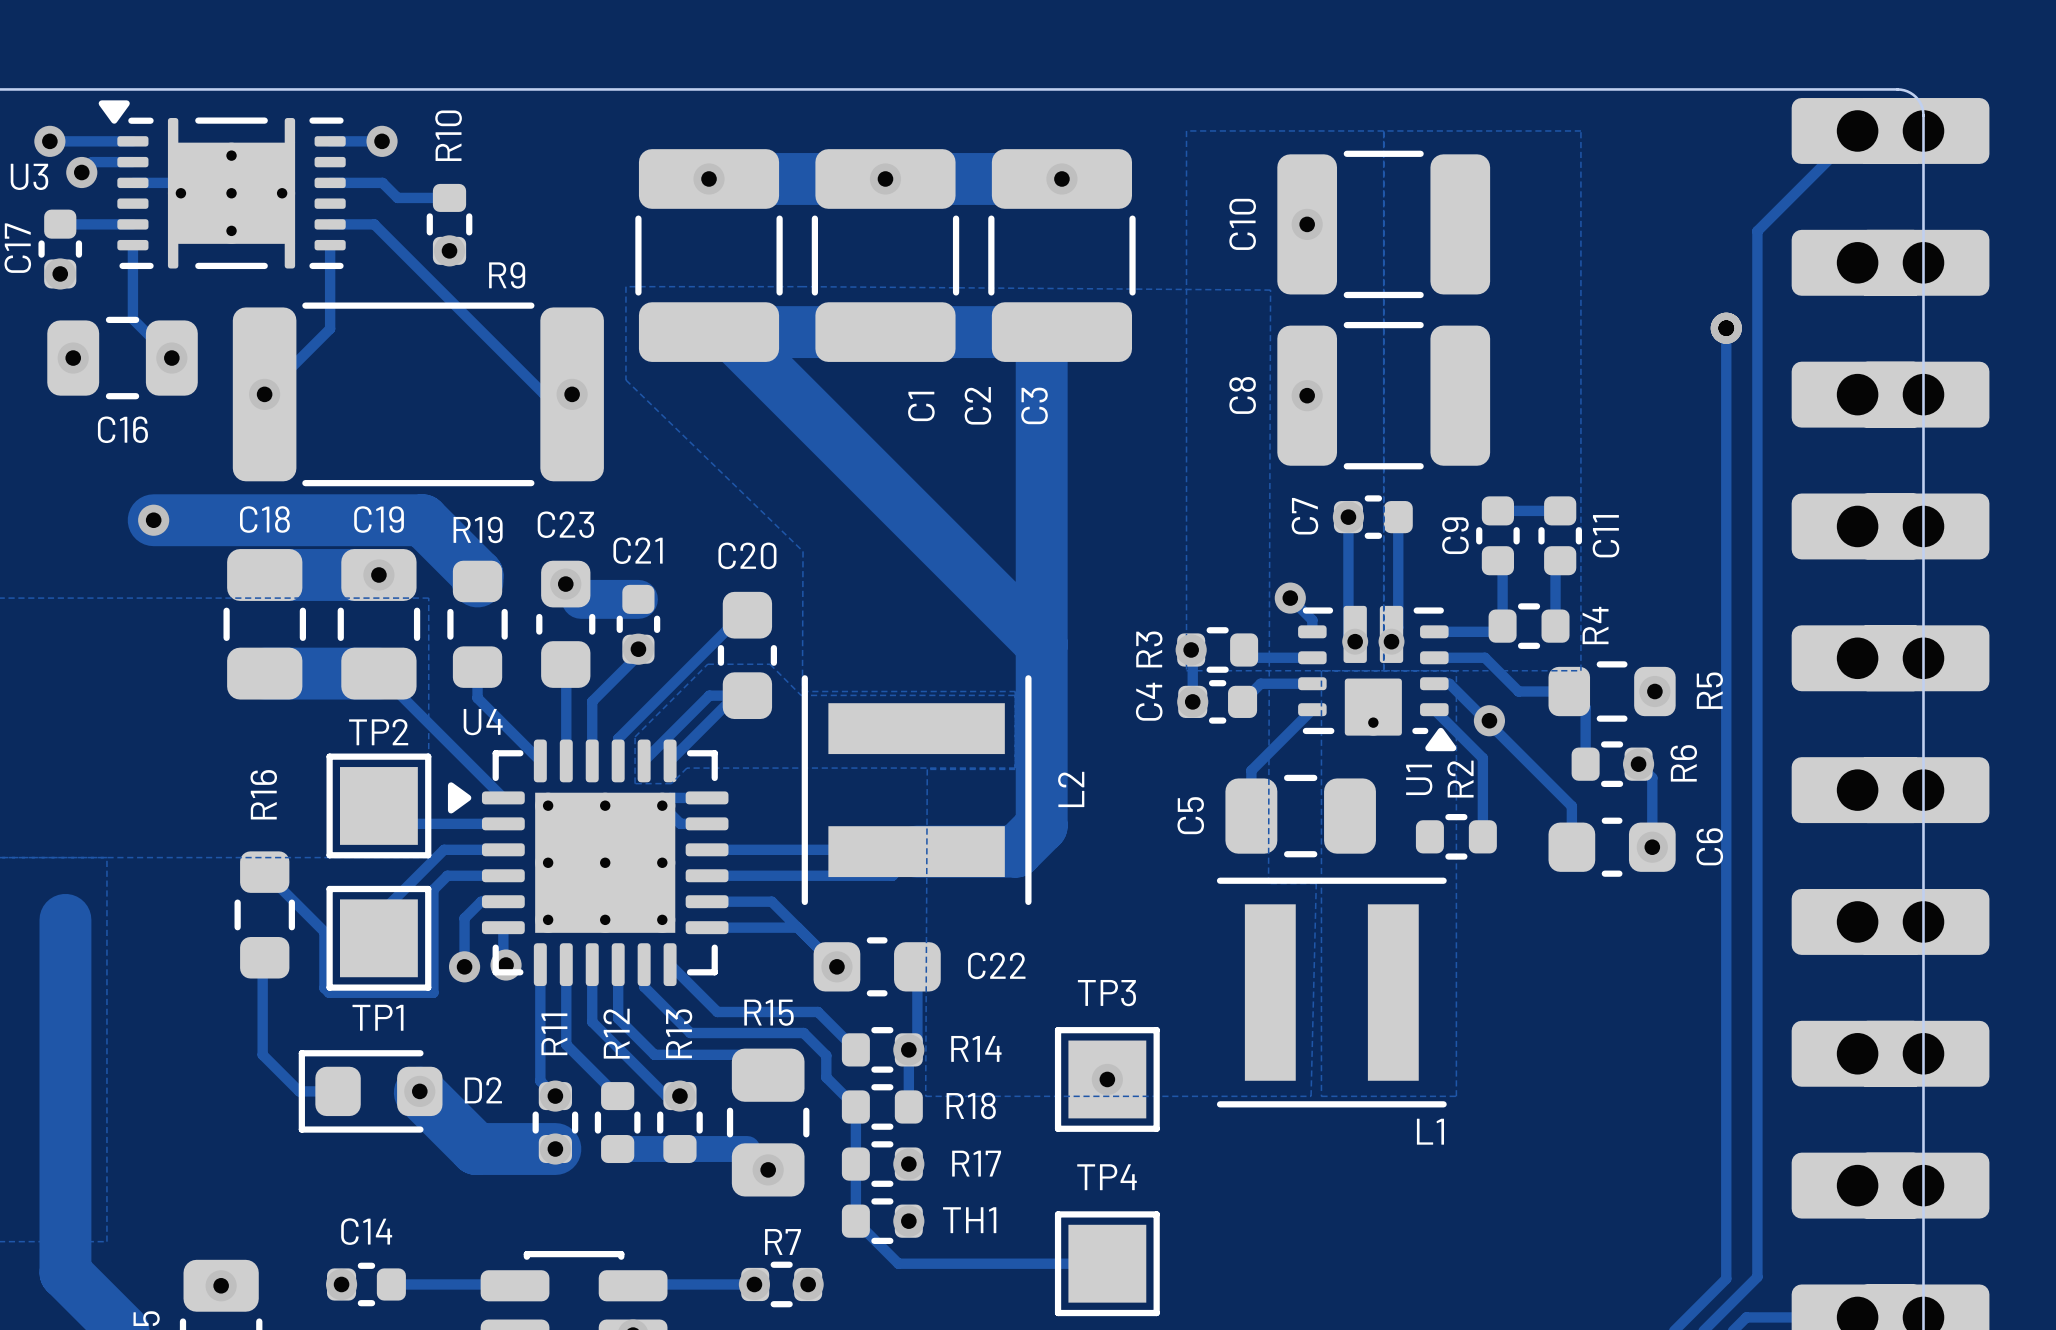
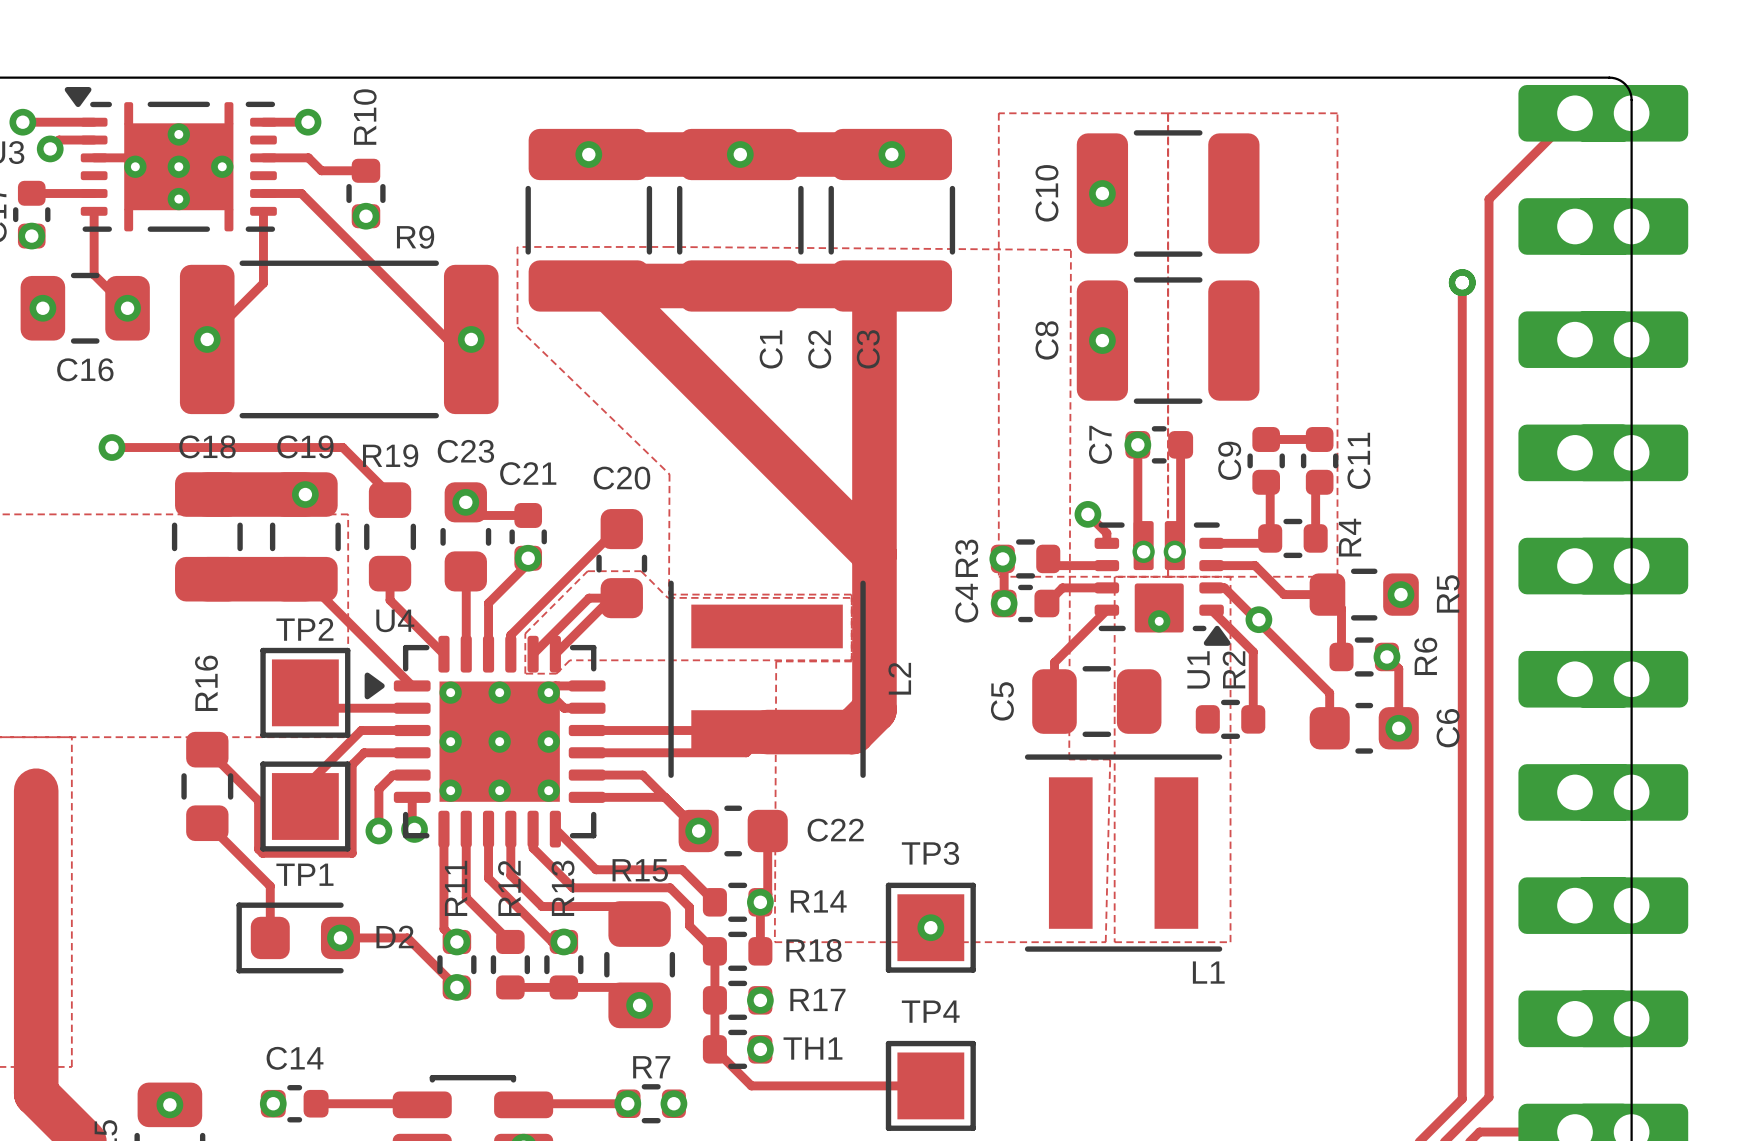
track width: thick (153, 520) (422, 520) (477, 575) (477, 581) -> thin (111, 447) (342, 447) (390, 494) (390, 500)
track width: thick (581, 599) (638, 599) -> thin (478, 515) (528, 515)
track: (264, 957) (262, 959) (262, 1054) (299, 1091) (338, 1091) -> (207, 823) (270, 886) (270, 937)
track: (419, 1091) (476, 1149) (555, 1149) -> (340, 937) (407, 937) (456, 987)
track width: thick (617, 1149) (747, 1149) -> thin (510, 987) (621, 987)

